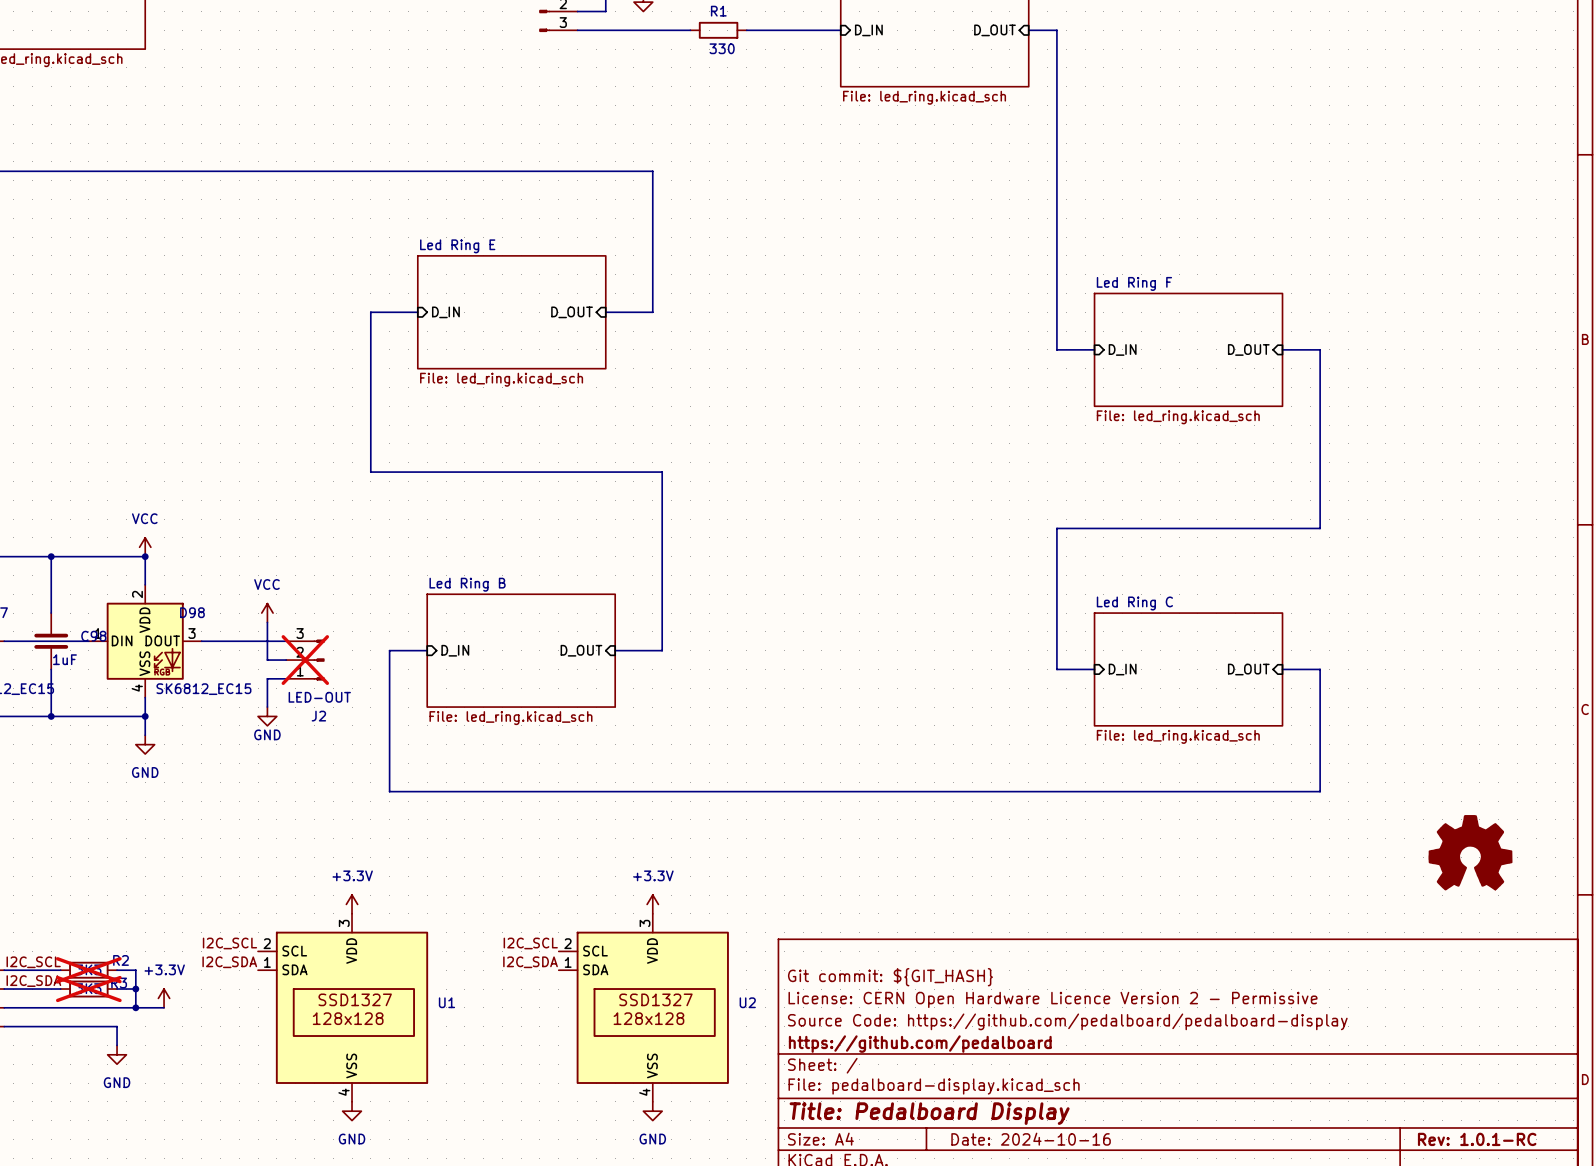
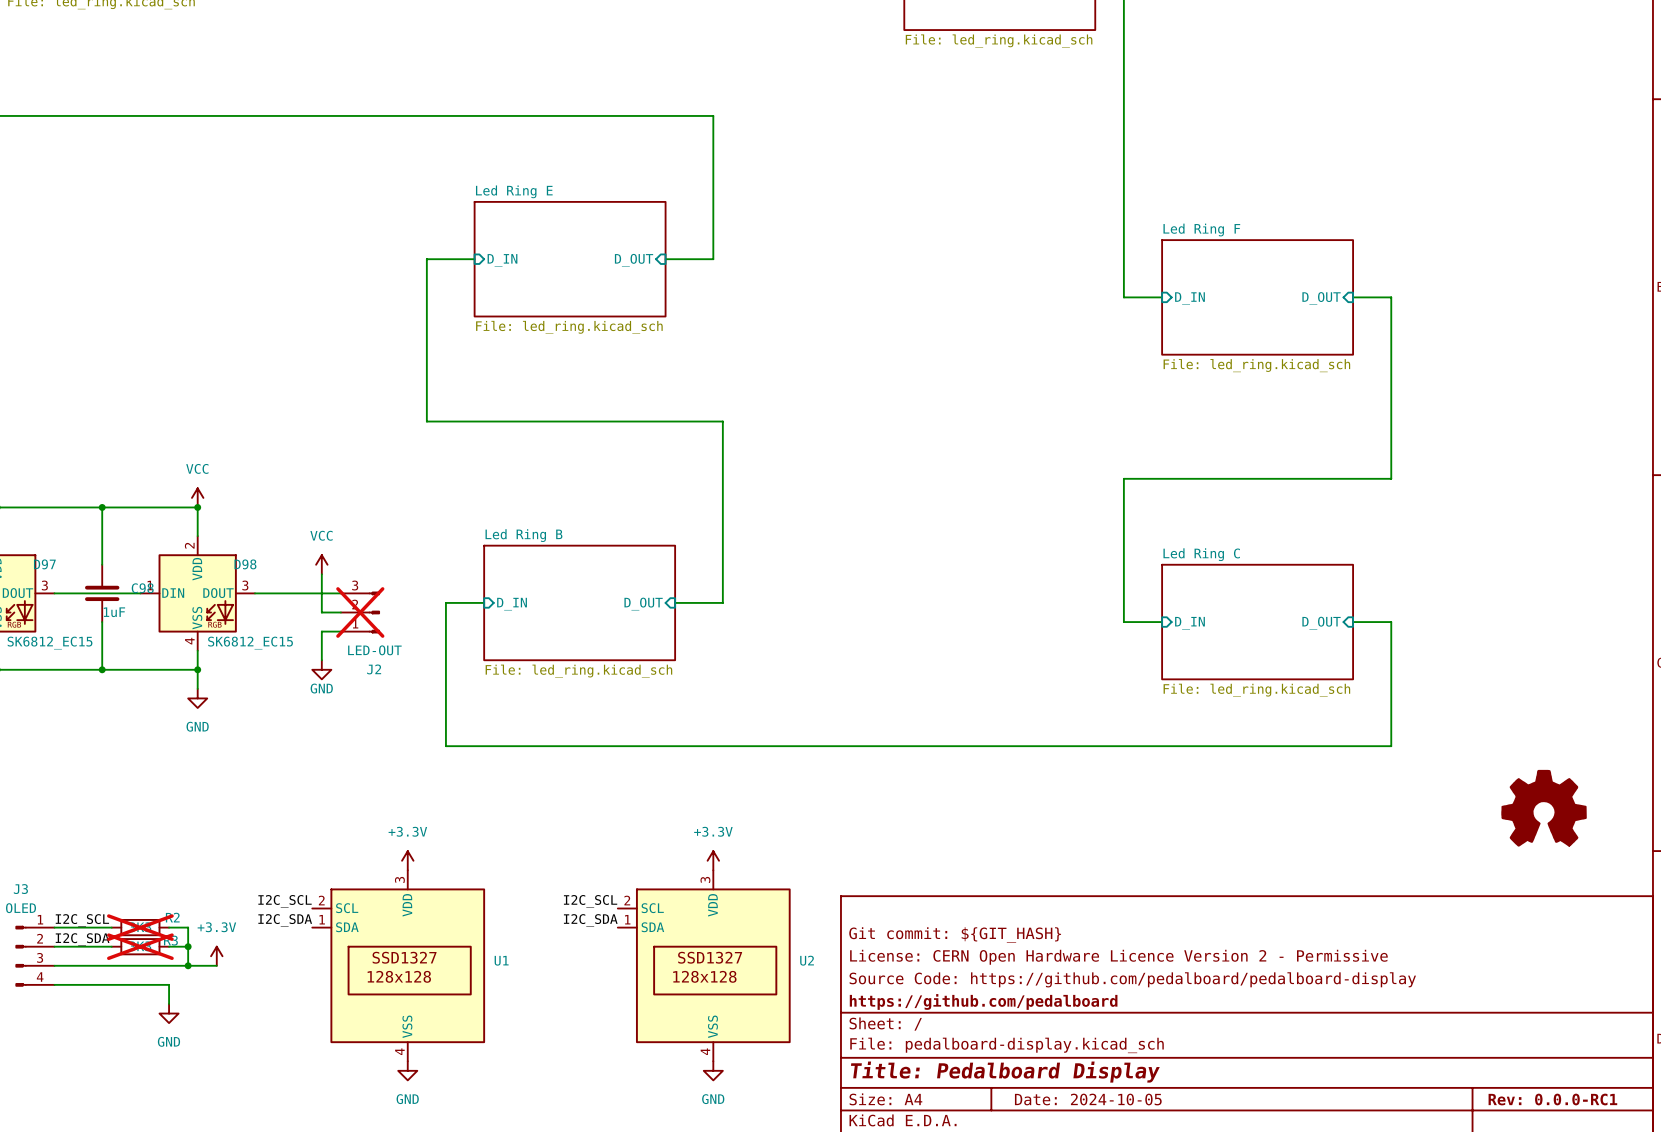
title block: Date: 2024-10-16 (1031, 1139) -> Date: 2024-10-05 (1088, 1099)
title block: Rev: 1.0.1-RC (1477, 1139) -> Rev: 0.0.0-RC1 (1552, 1099)

